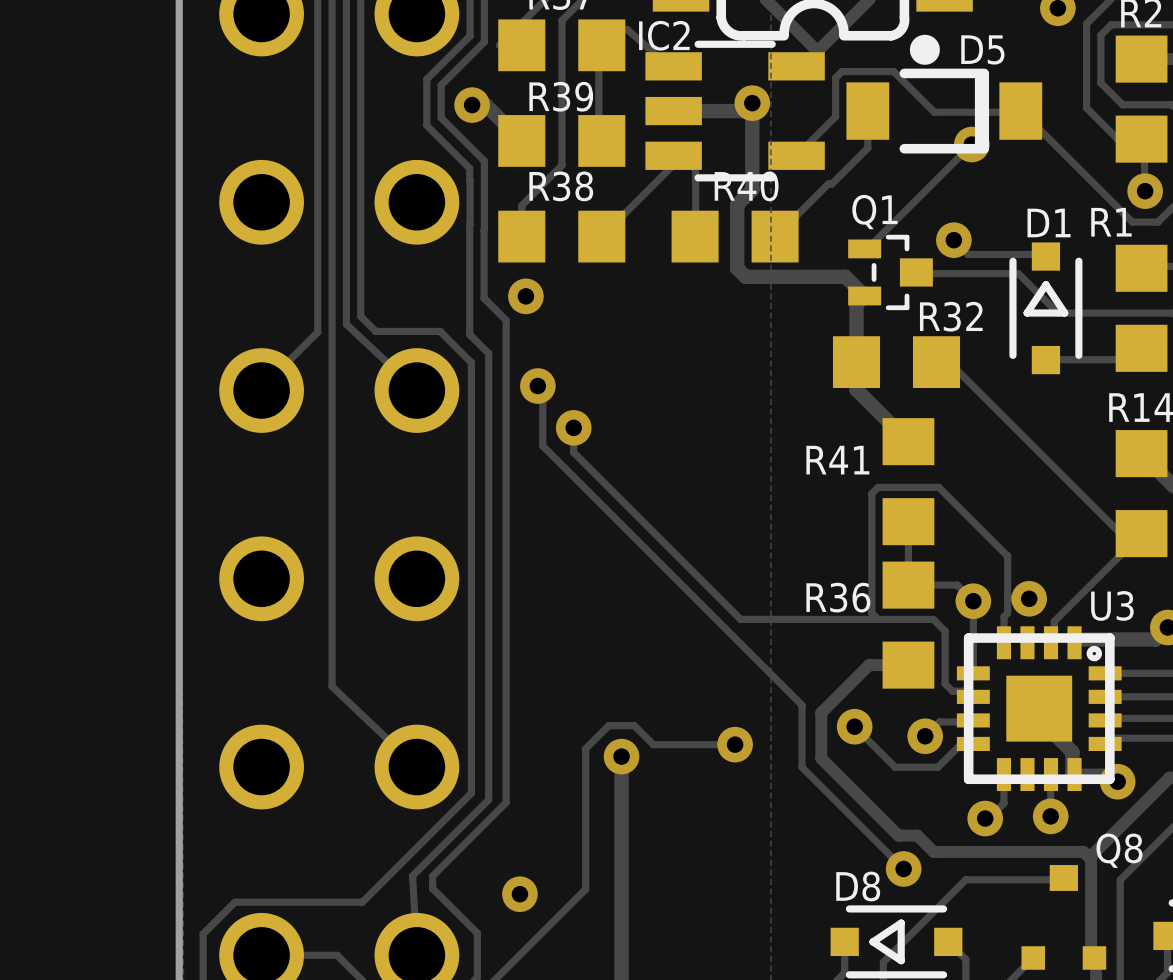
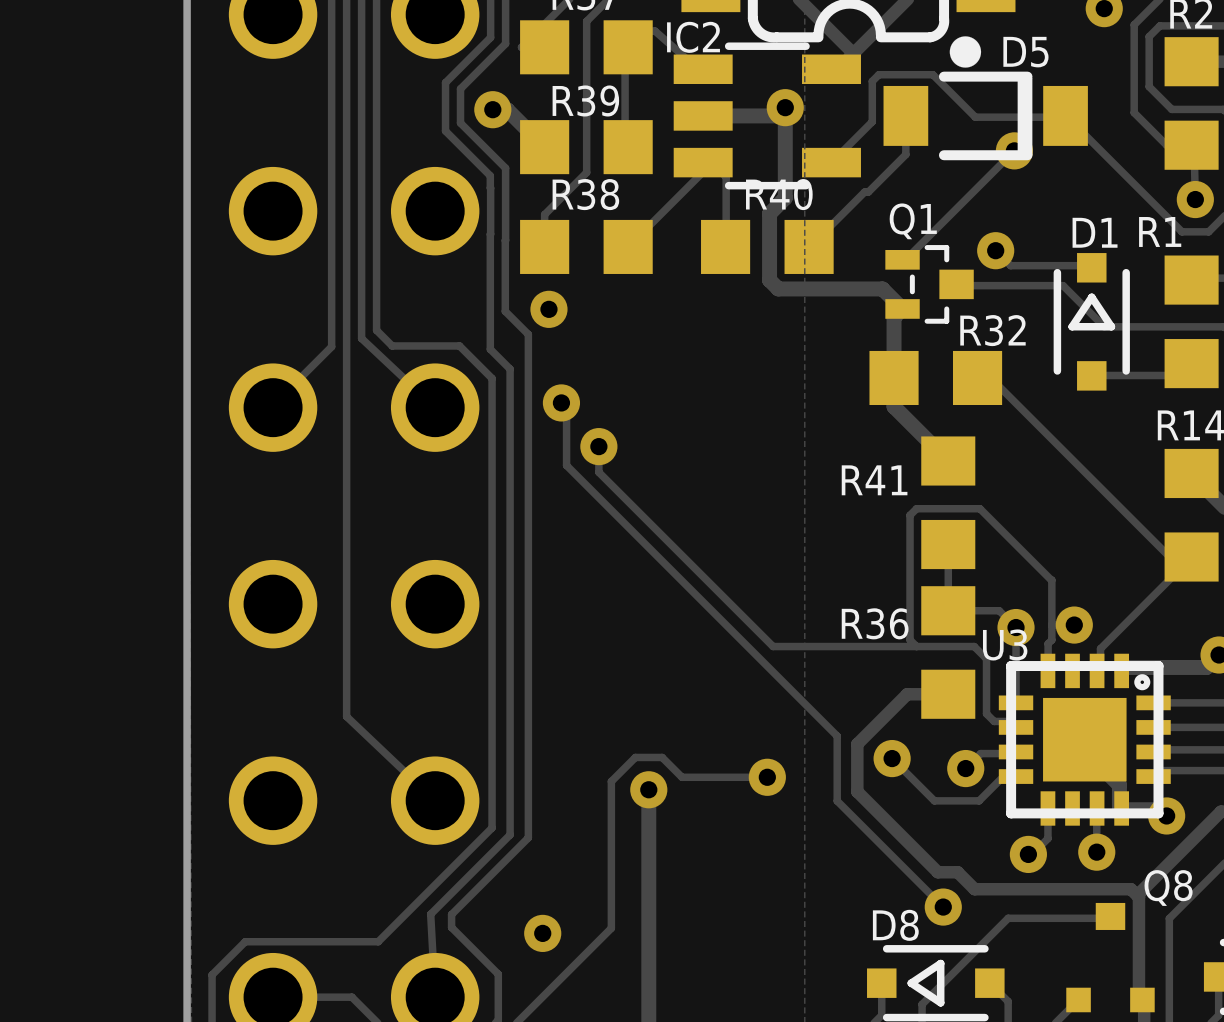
U3 name position: U3 (1112, 605) -> U3 (1005, 644)
U3 footprint: [956, 626, 1122, 792] -> [998, 653, 1171, 826]

